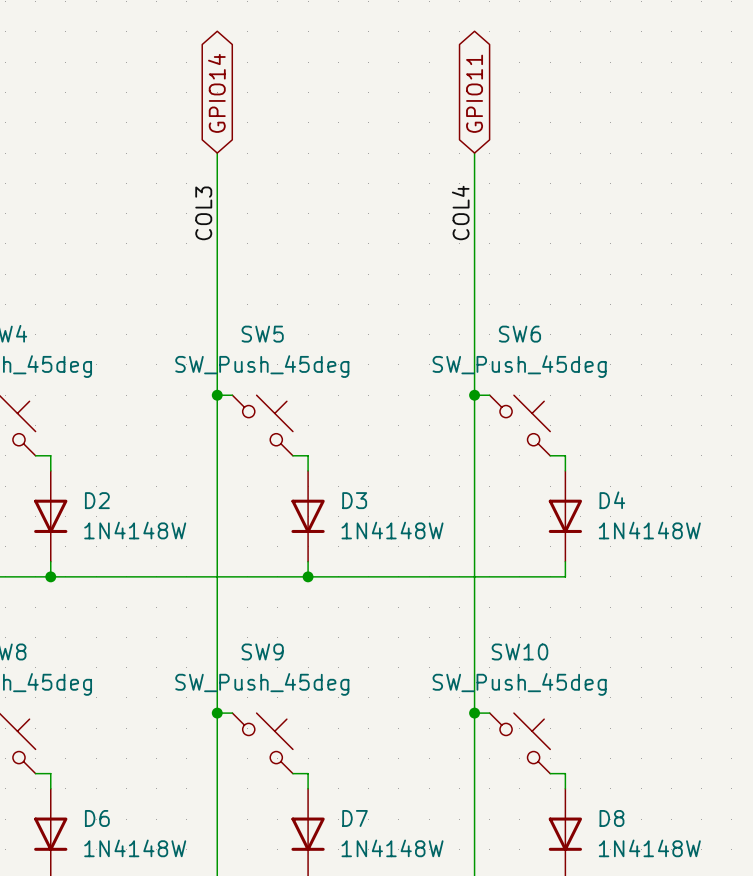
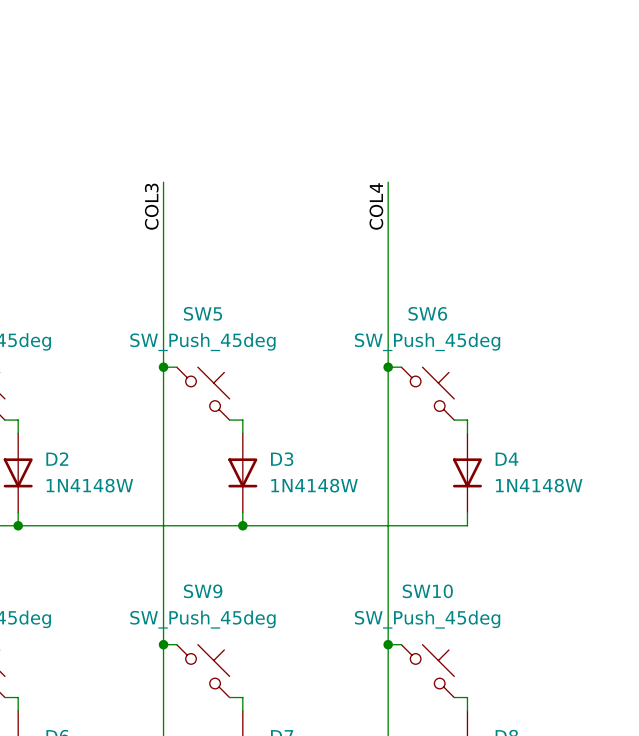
global label: GPIO14 (216, 93) -> none
global label: GPIO11 (474, 93) -> none
wire: (217, 153) (217, 183) -> none
wire: (474, 153) (474, 183) -> none

